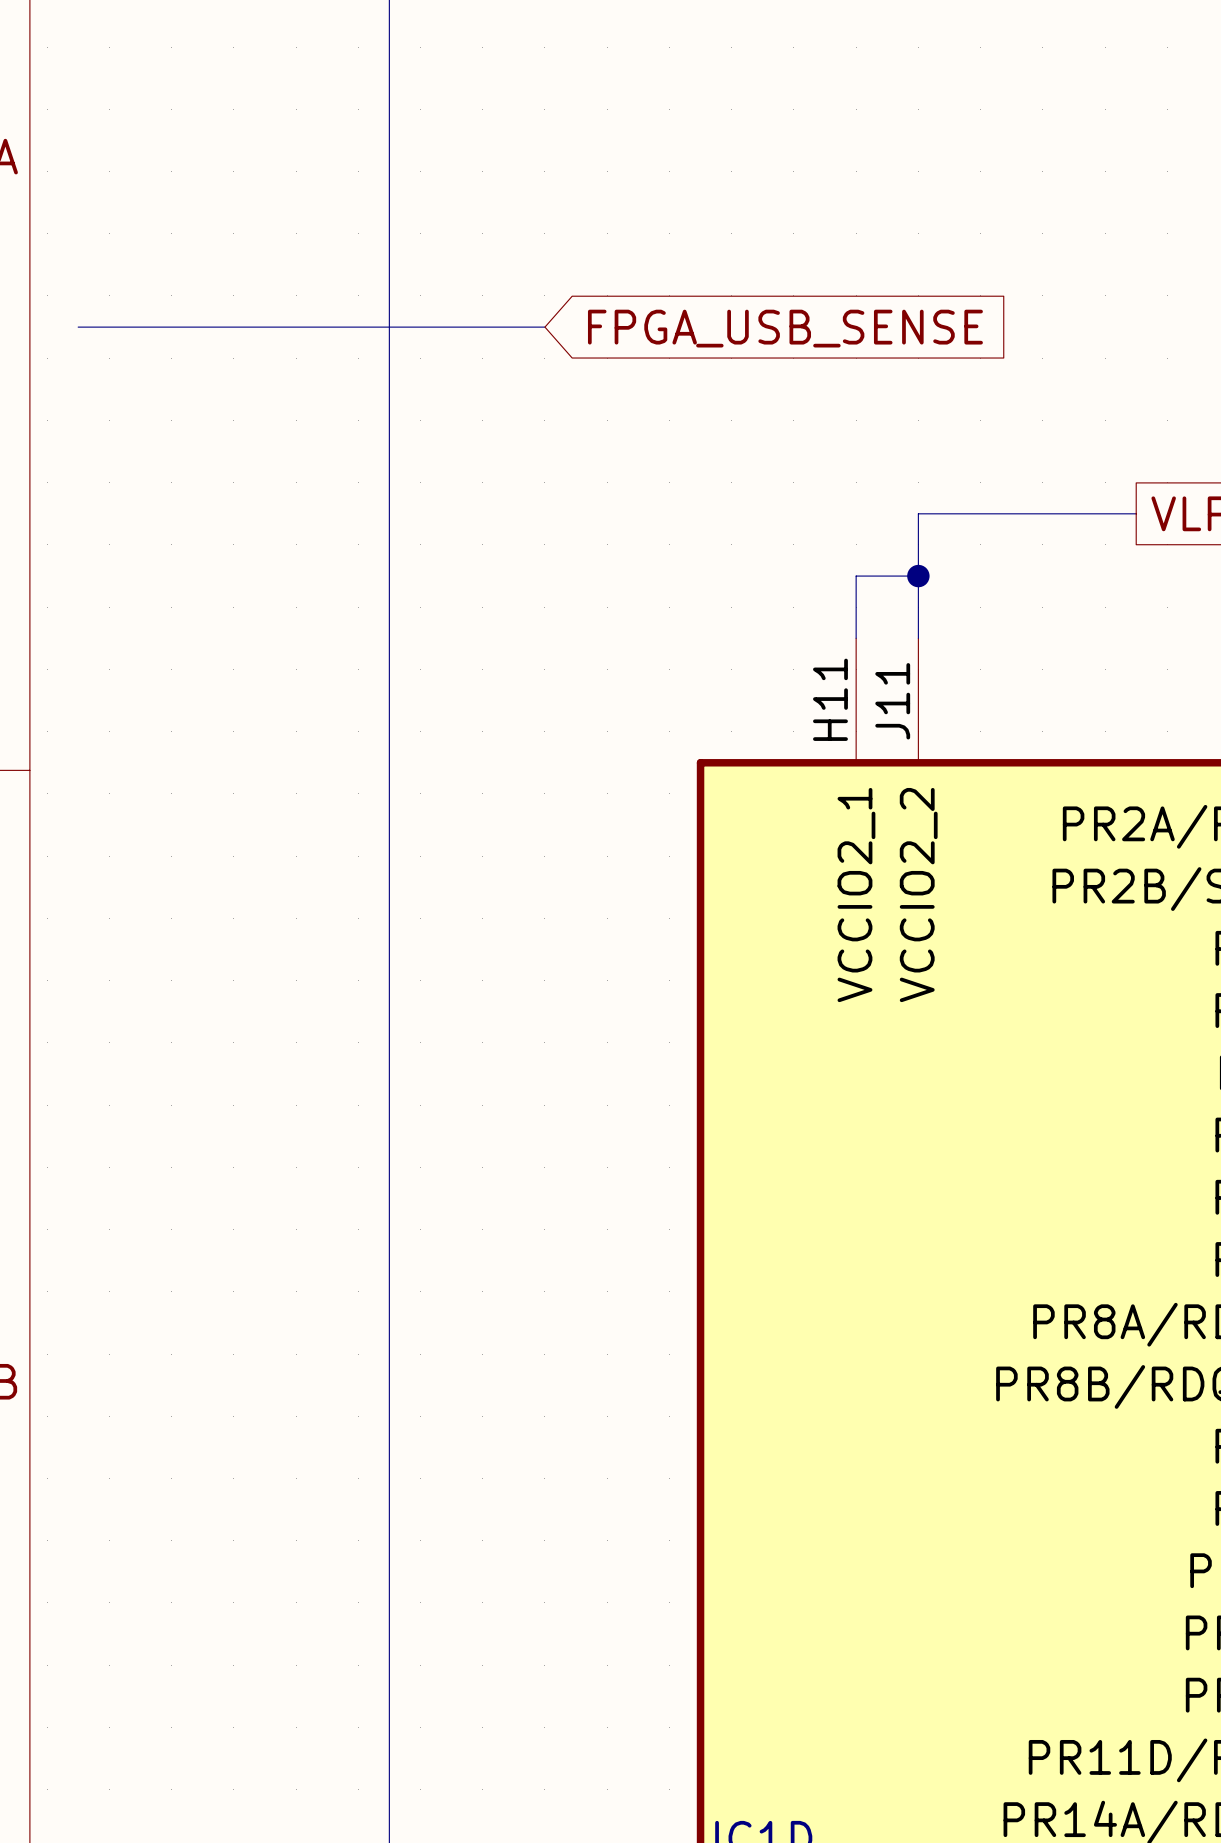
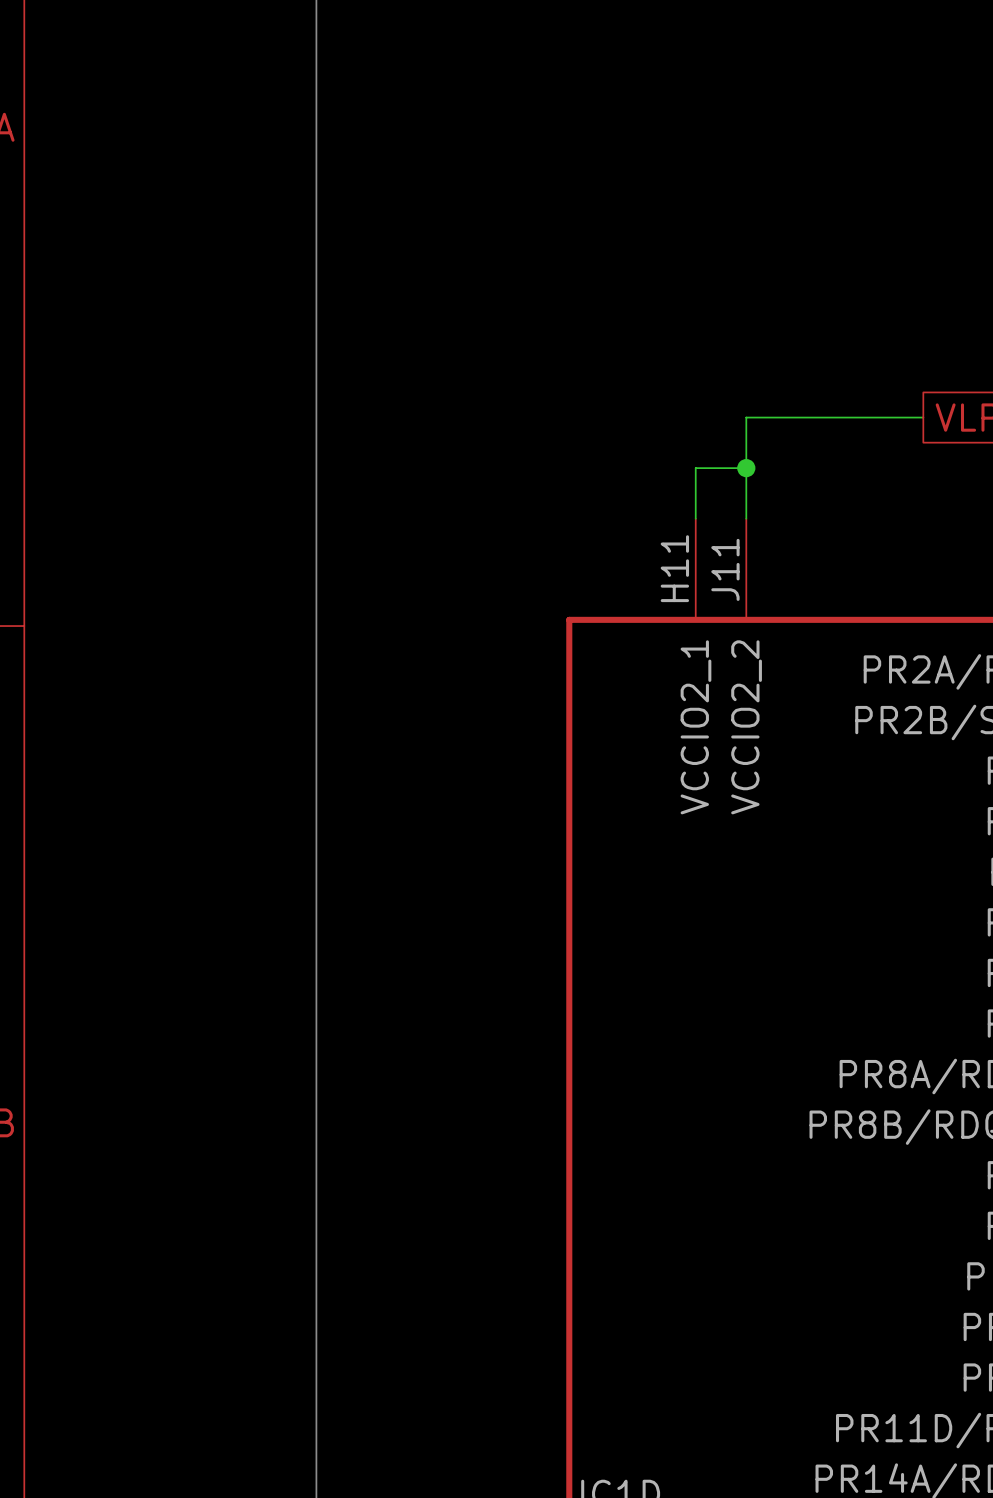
wire: (78, 327) (544, 327) -> none
global label: FPGA_USB_SENSE (785, 328) -> none

